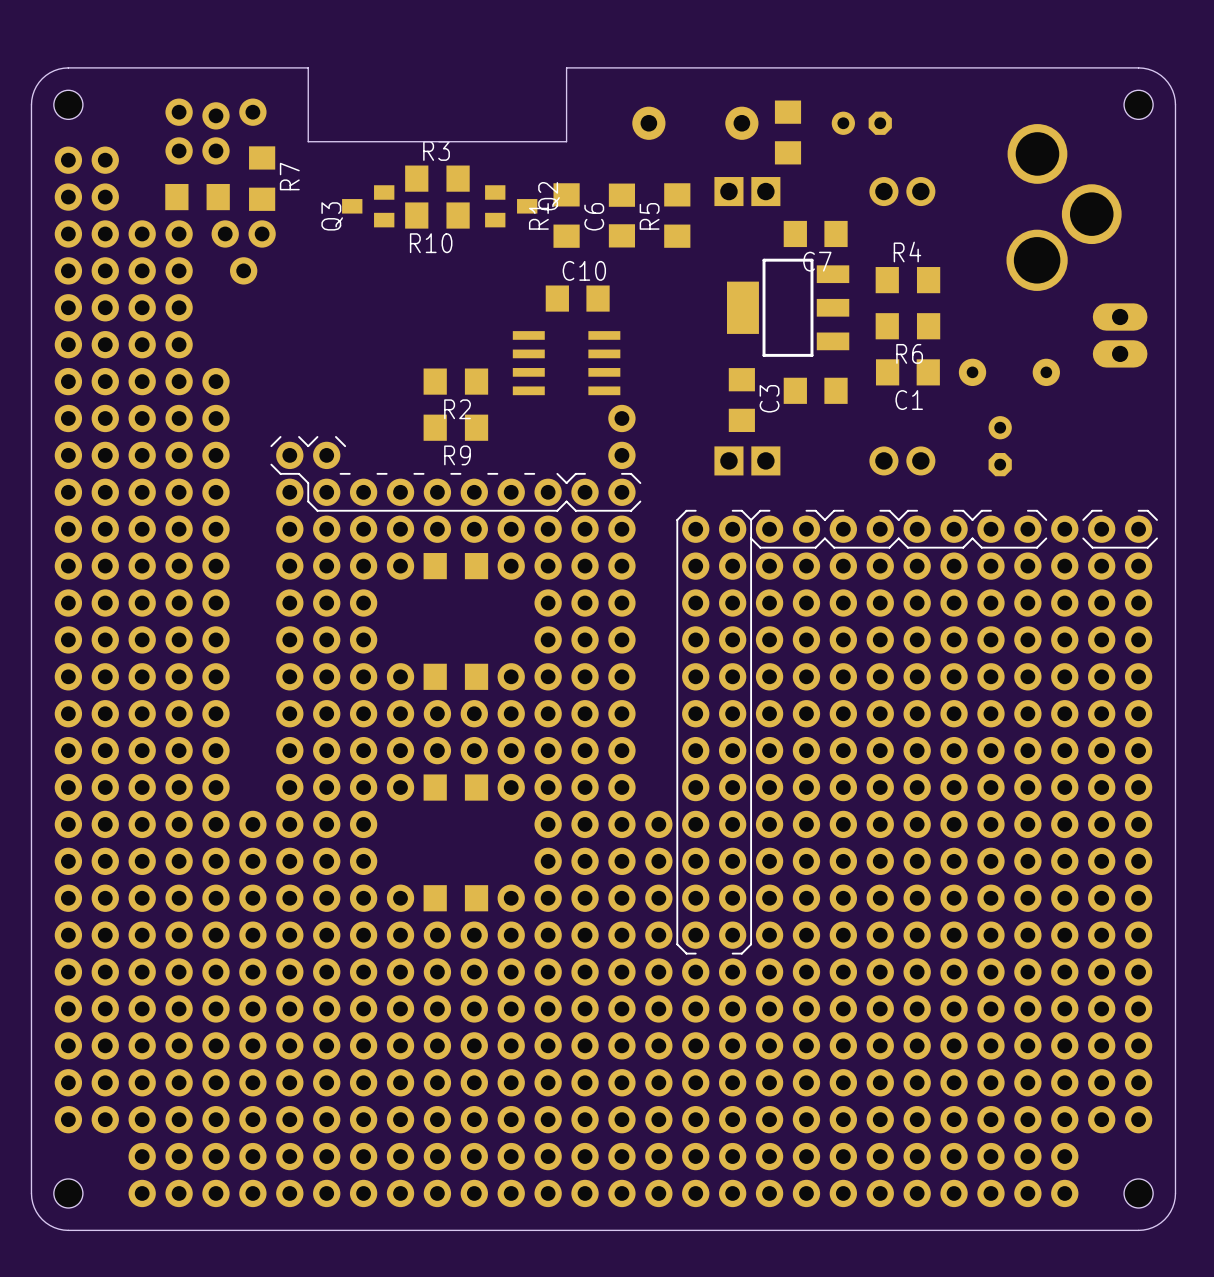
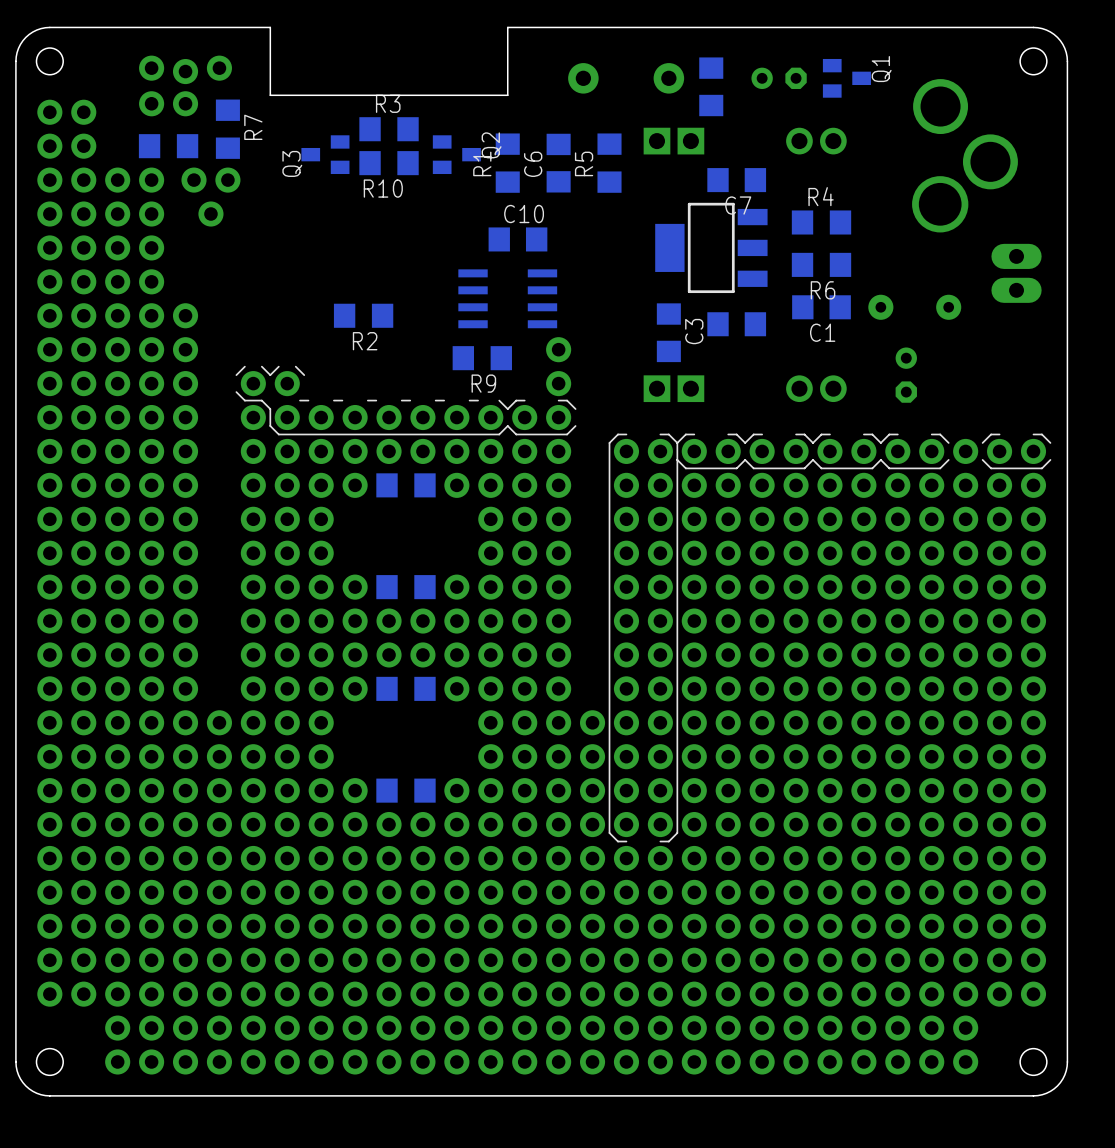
Q1: none -> (846, 78)
R2 position: (455, 381) -> (363, 315)
R9 position: (455, 427) -> (482, 358)

